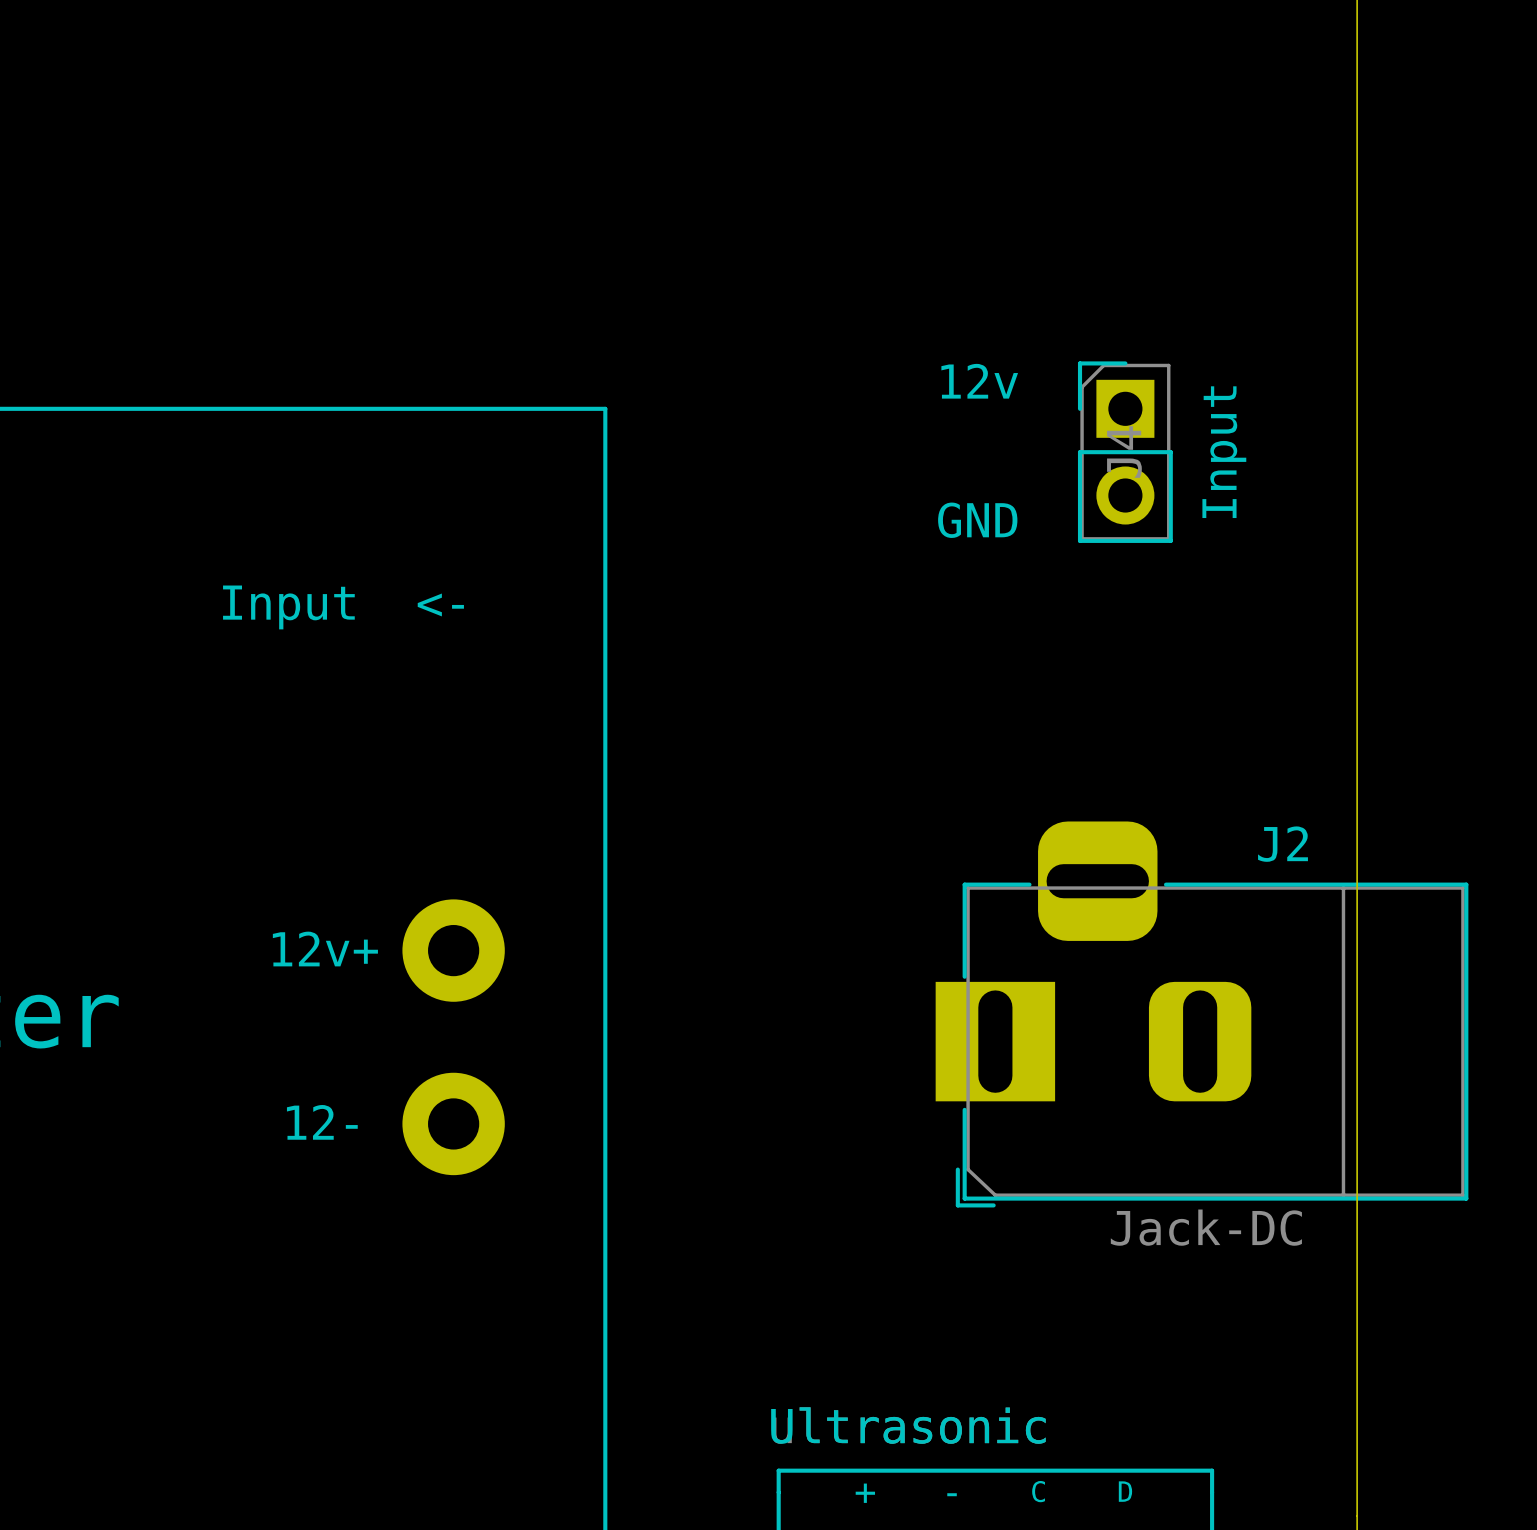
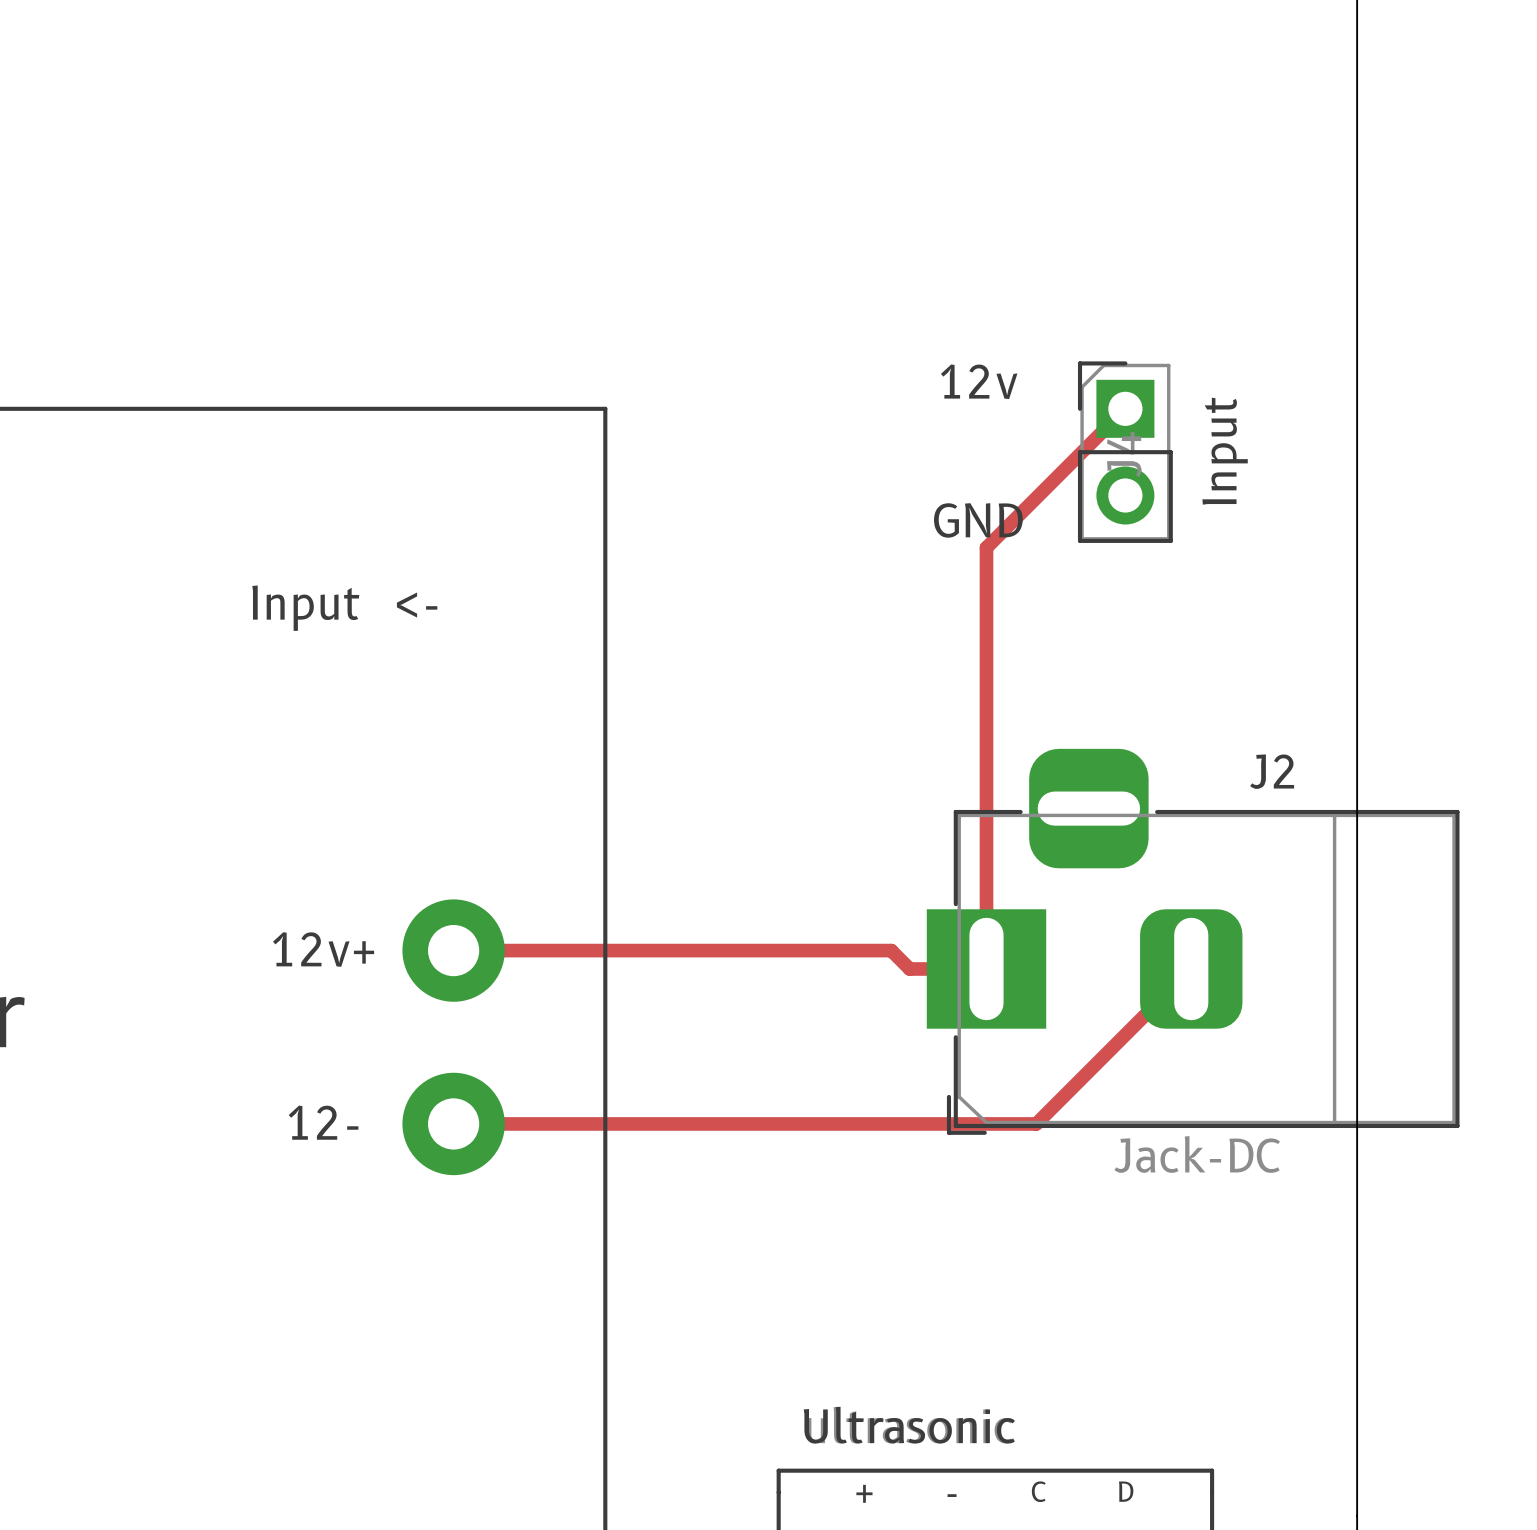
track: none -> (1125, 408) (986, 547) (986, 968) (909, 968) (891, 950) (453, 950)
track: none -> (1191, 968) (1036, 1123) (453, 1123)
J2 position: (1202, 1014) -> (1193, 941)

